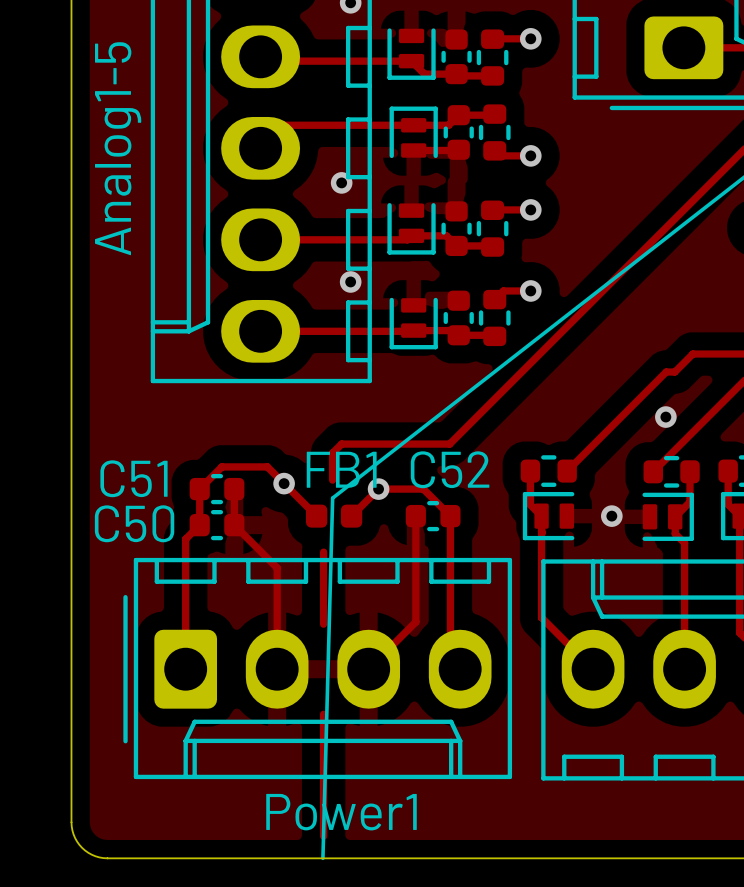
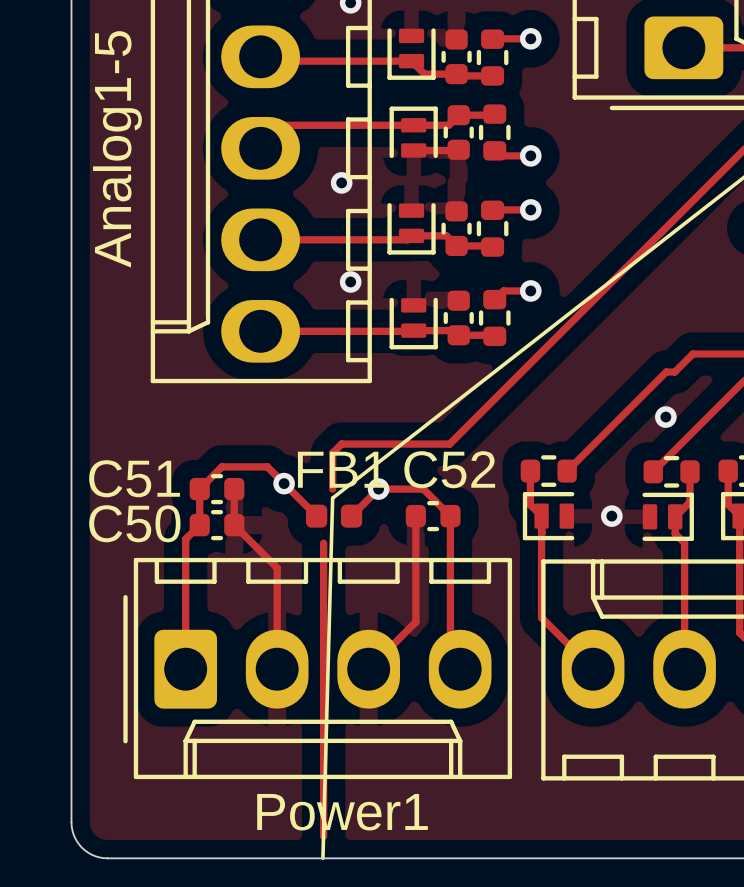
track: none -> (332, 480) (332, 489)
track: none -> (323, 543) (323, 552)
track: none -> (323, 624) (323, 714)

